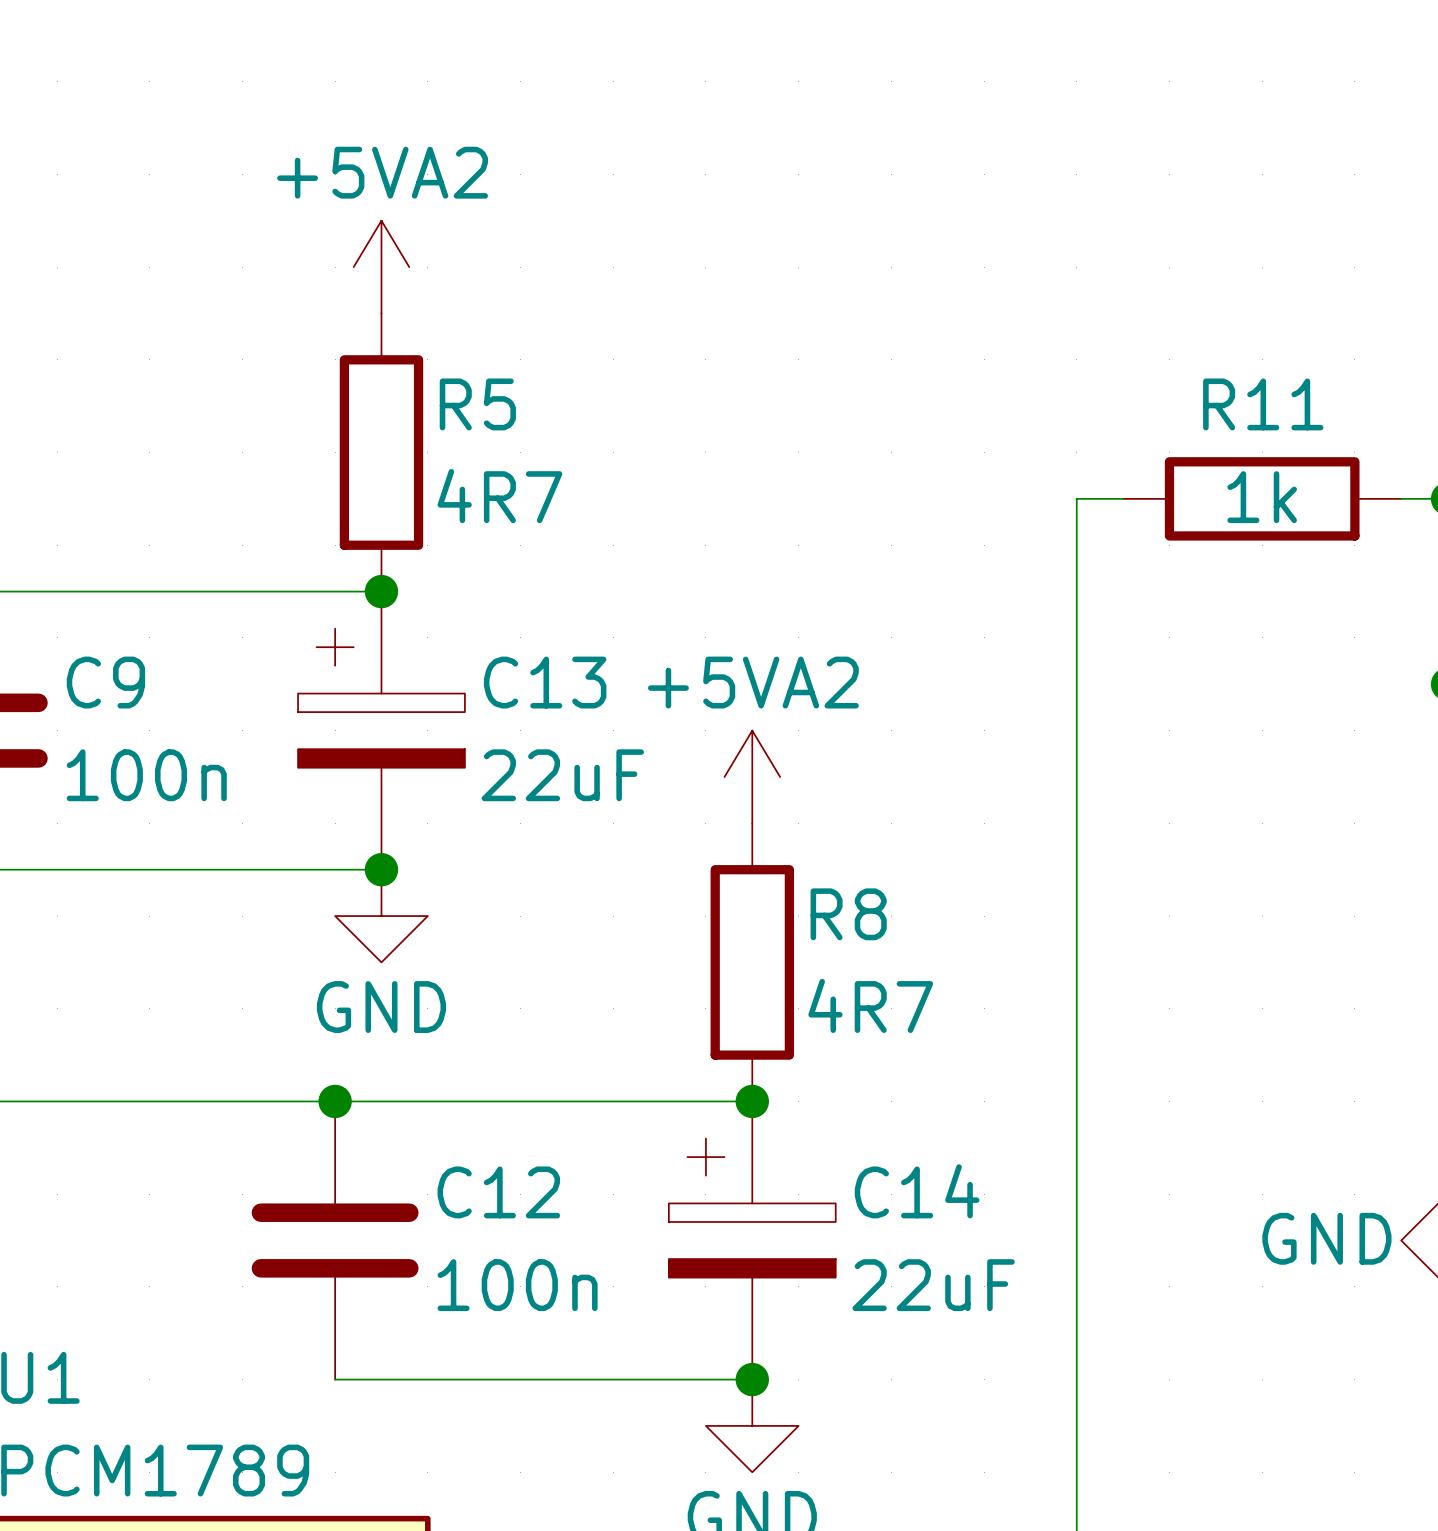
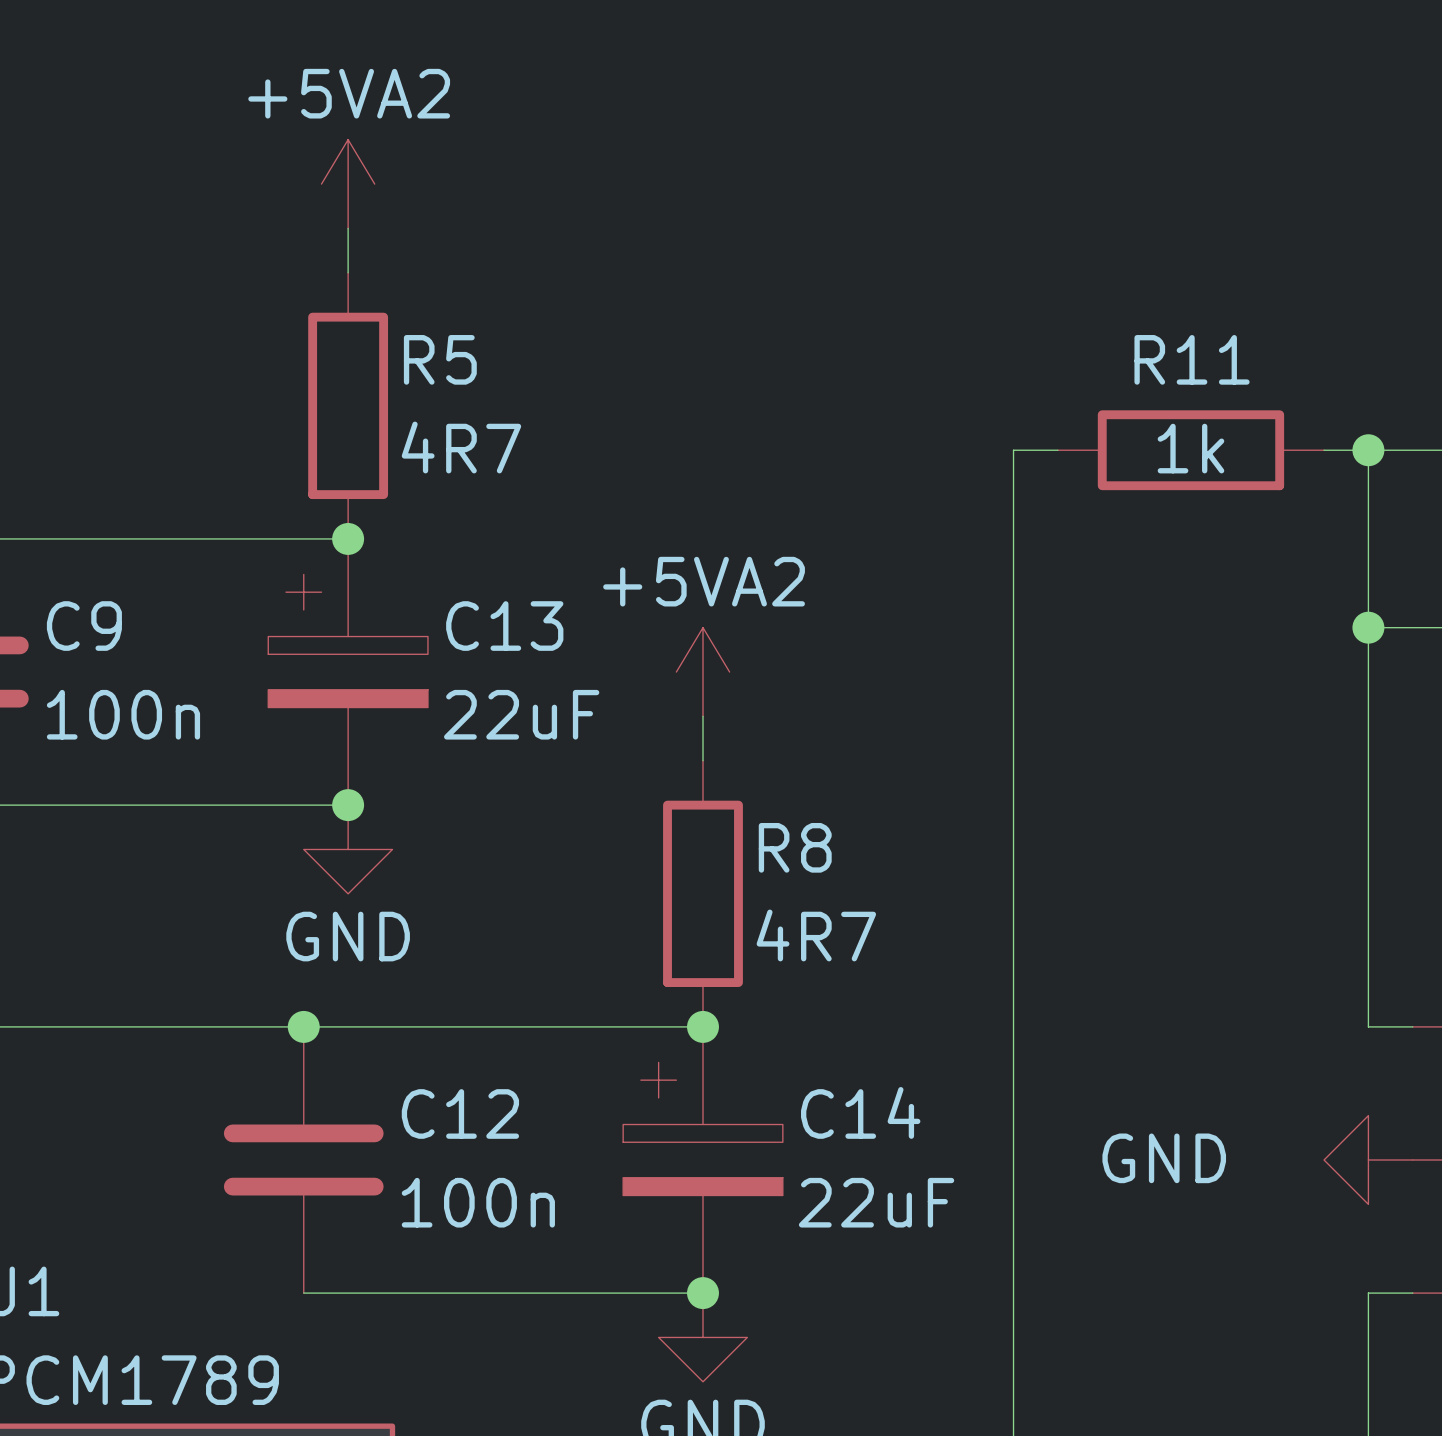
power symbol position: +5VA2 (381, 267) -> +5VA2 (348, 184)
power symbol position: +5VA2 (752, 776) -> +5VA2 (703, 672)
power symbol text position: GND (1326, 1238) -> GND (1164, 1158)

